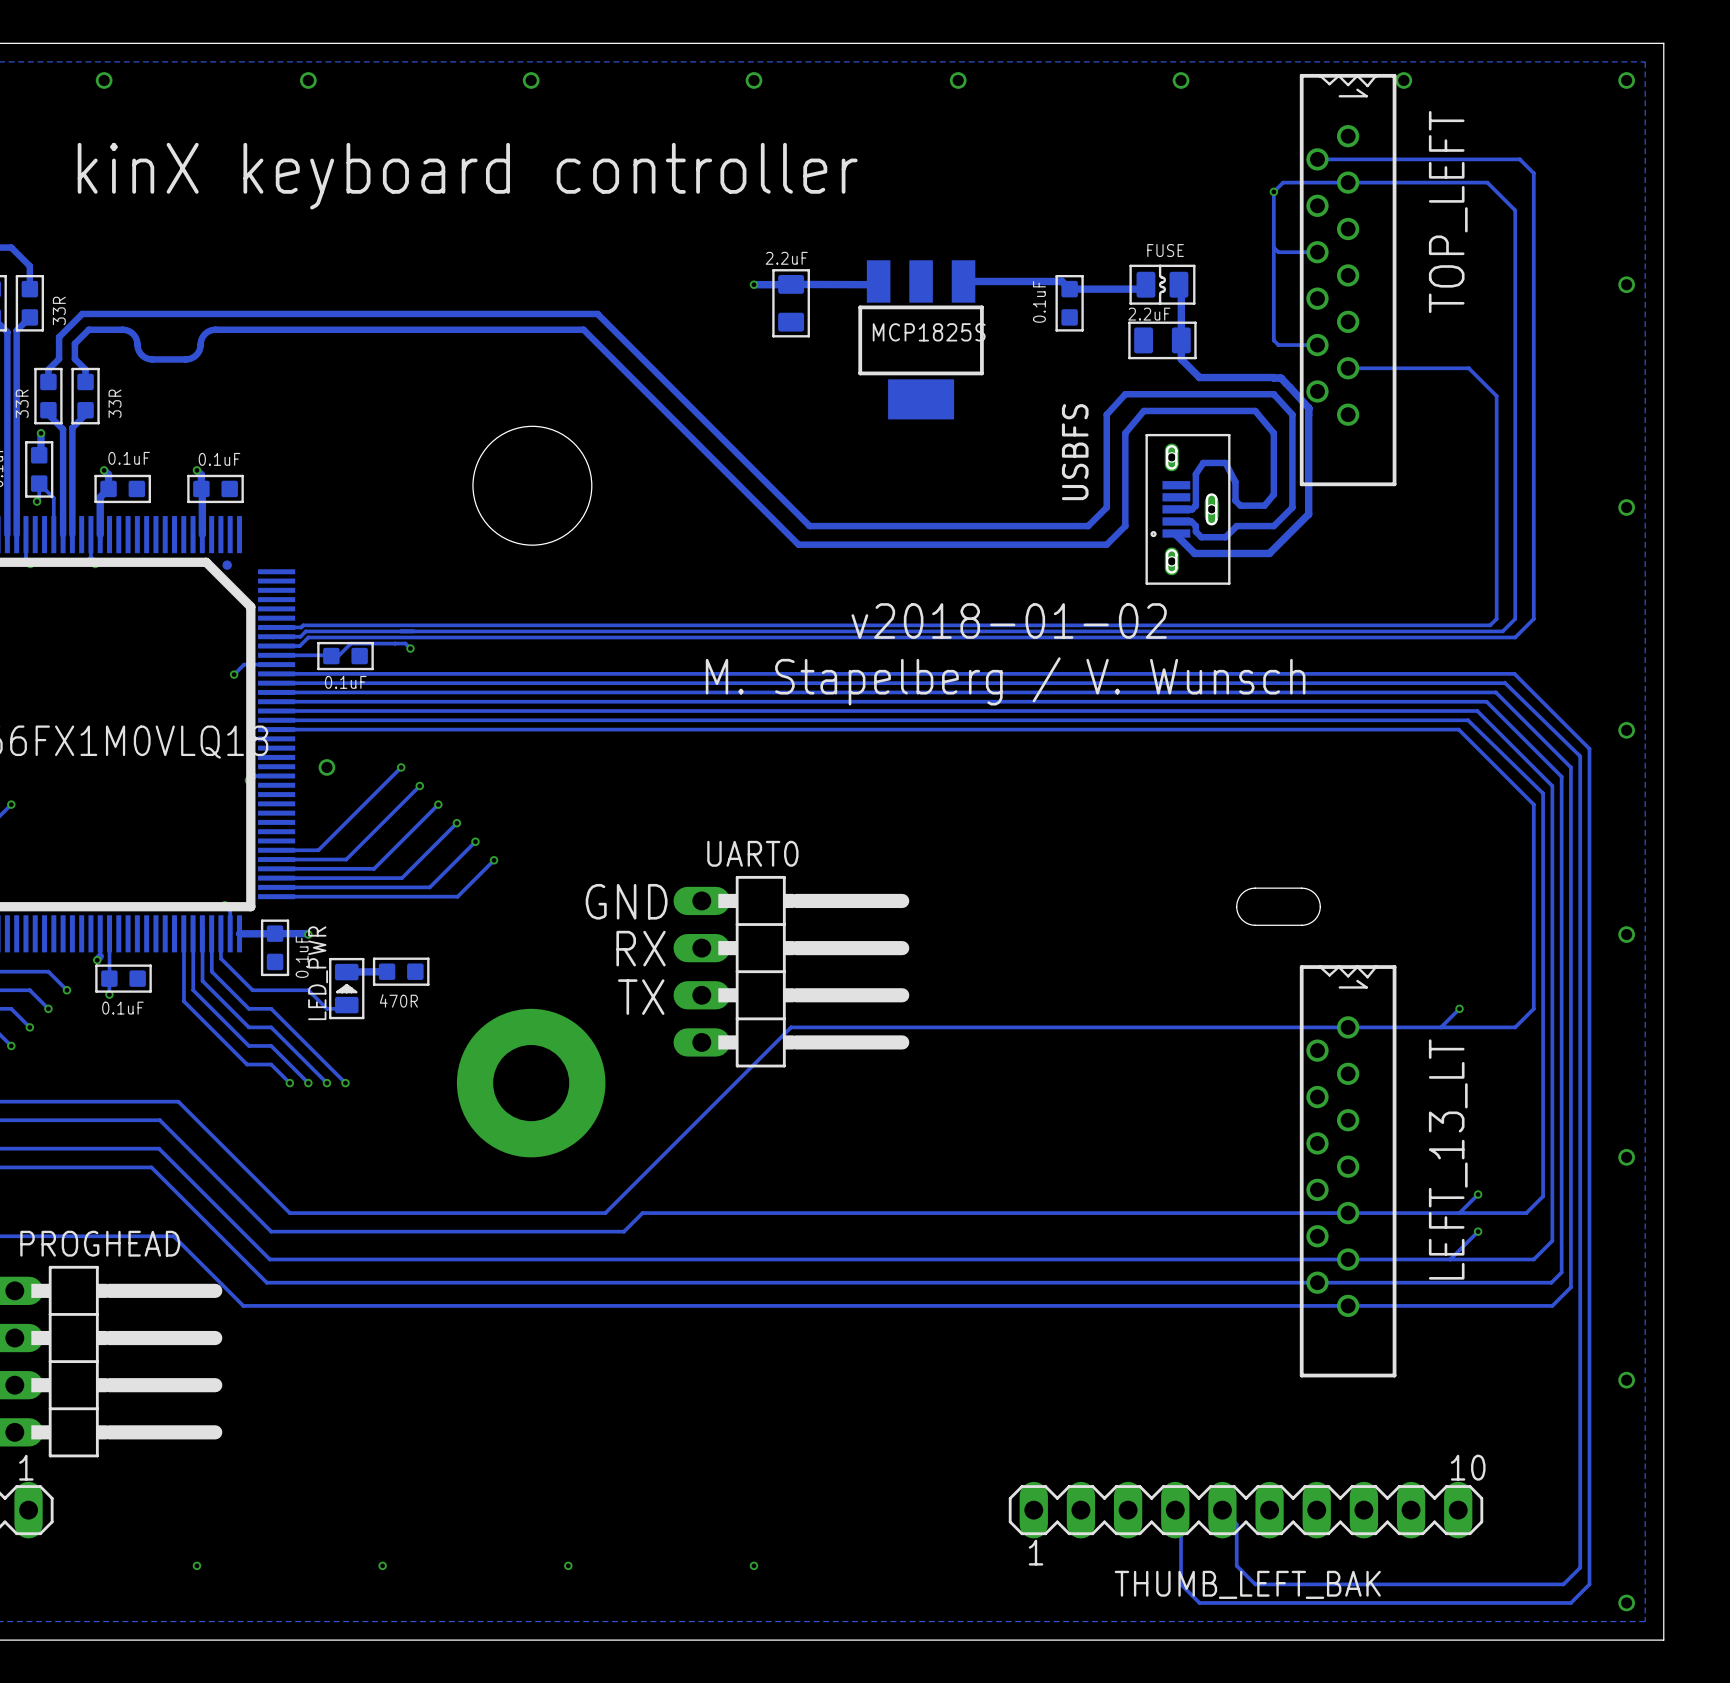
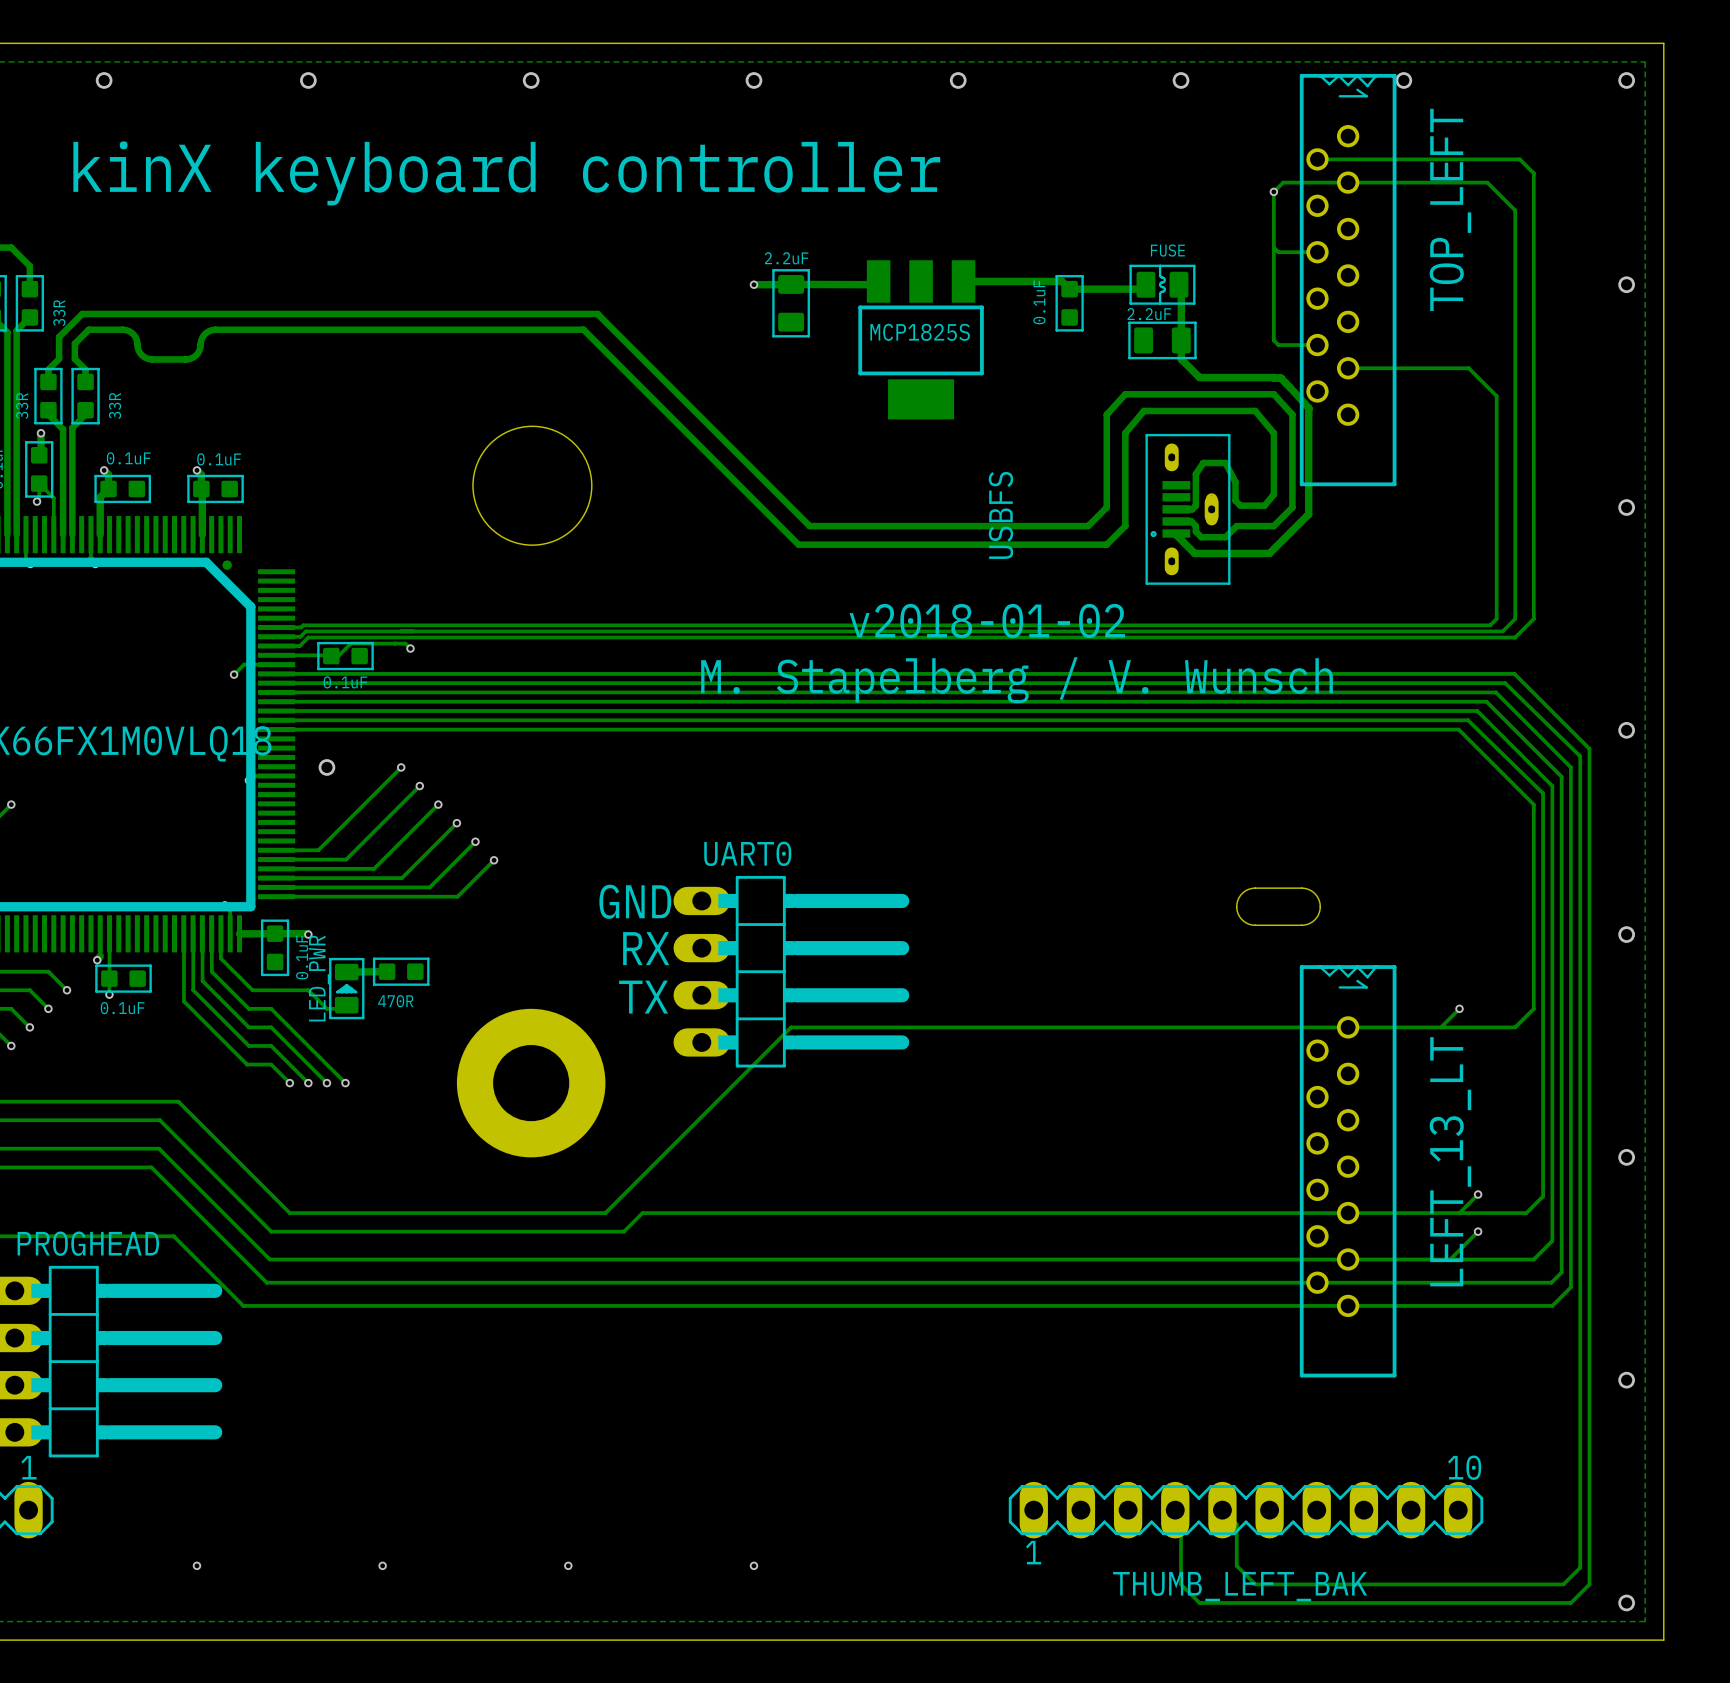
USBFS name position: USBFS (1075, 452) -> USBFS (1000, 515)

